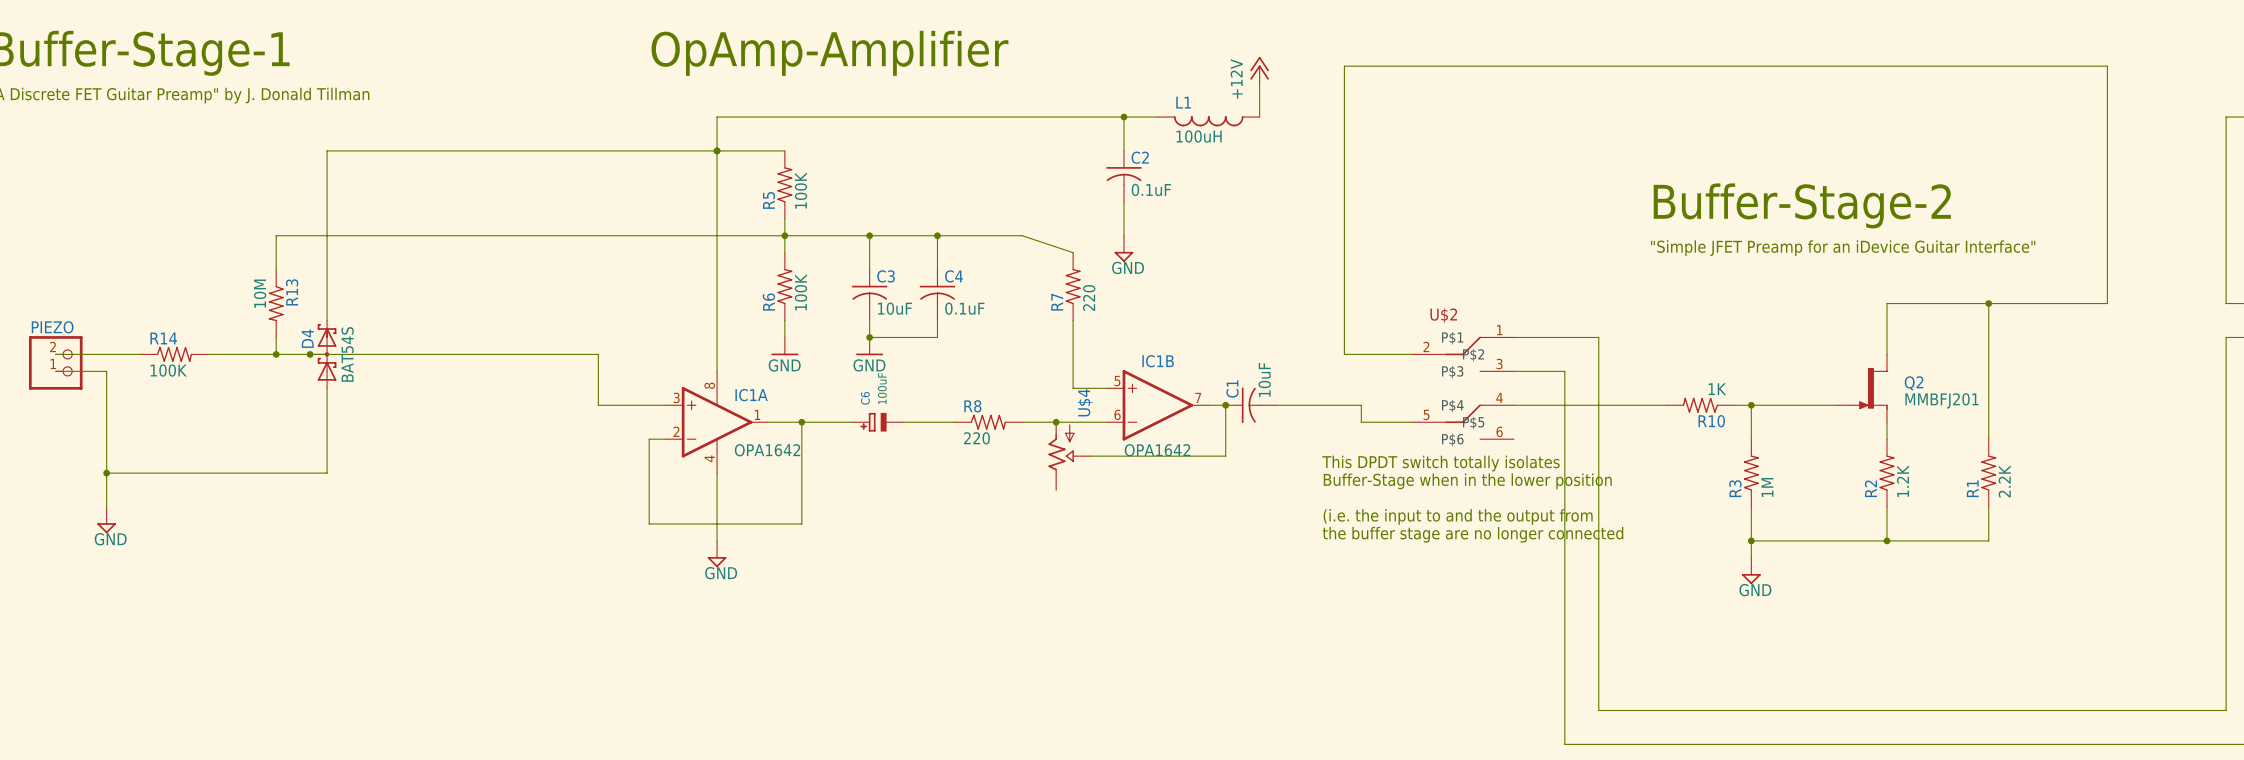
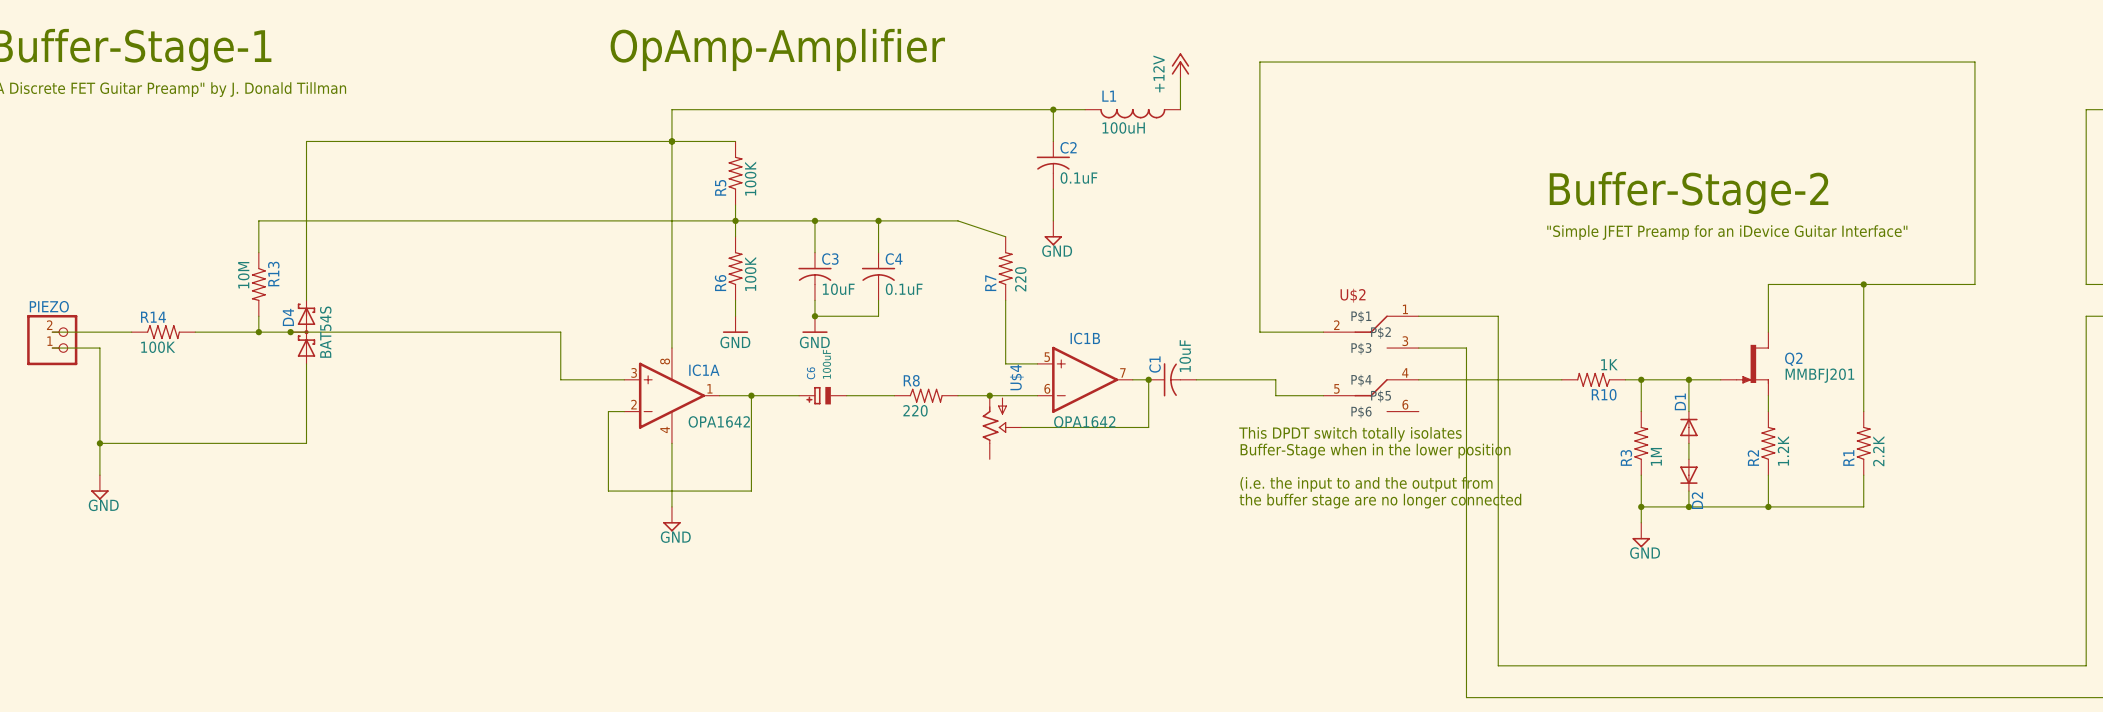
wire: none -> (1688, 379) (1688, 411)
junction: none -> (1688, 379)
D1: none -> (1688, 427)
wire: none -> (1688, 443) (1688, 459)
D2: none -> (1688, 475)
wire: none -> (1688, 491) (1688, 506)
junction: none -> (1688, 506)

